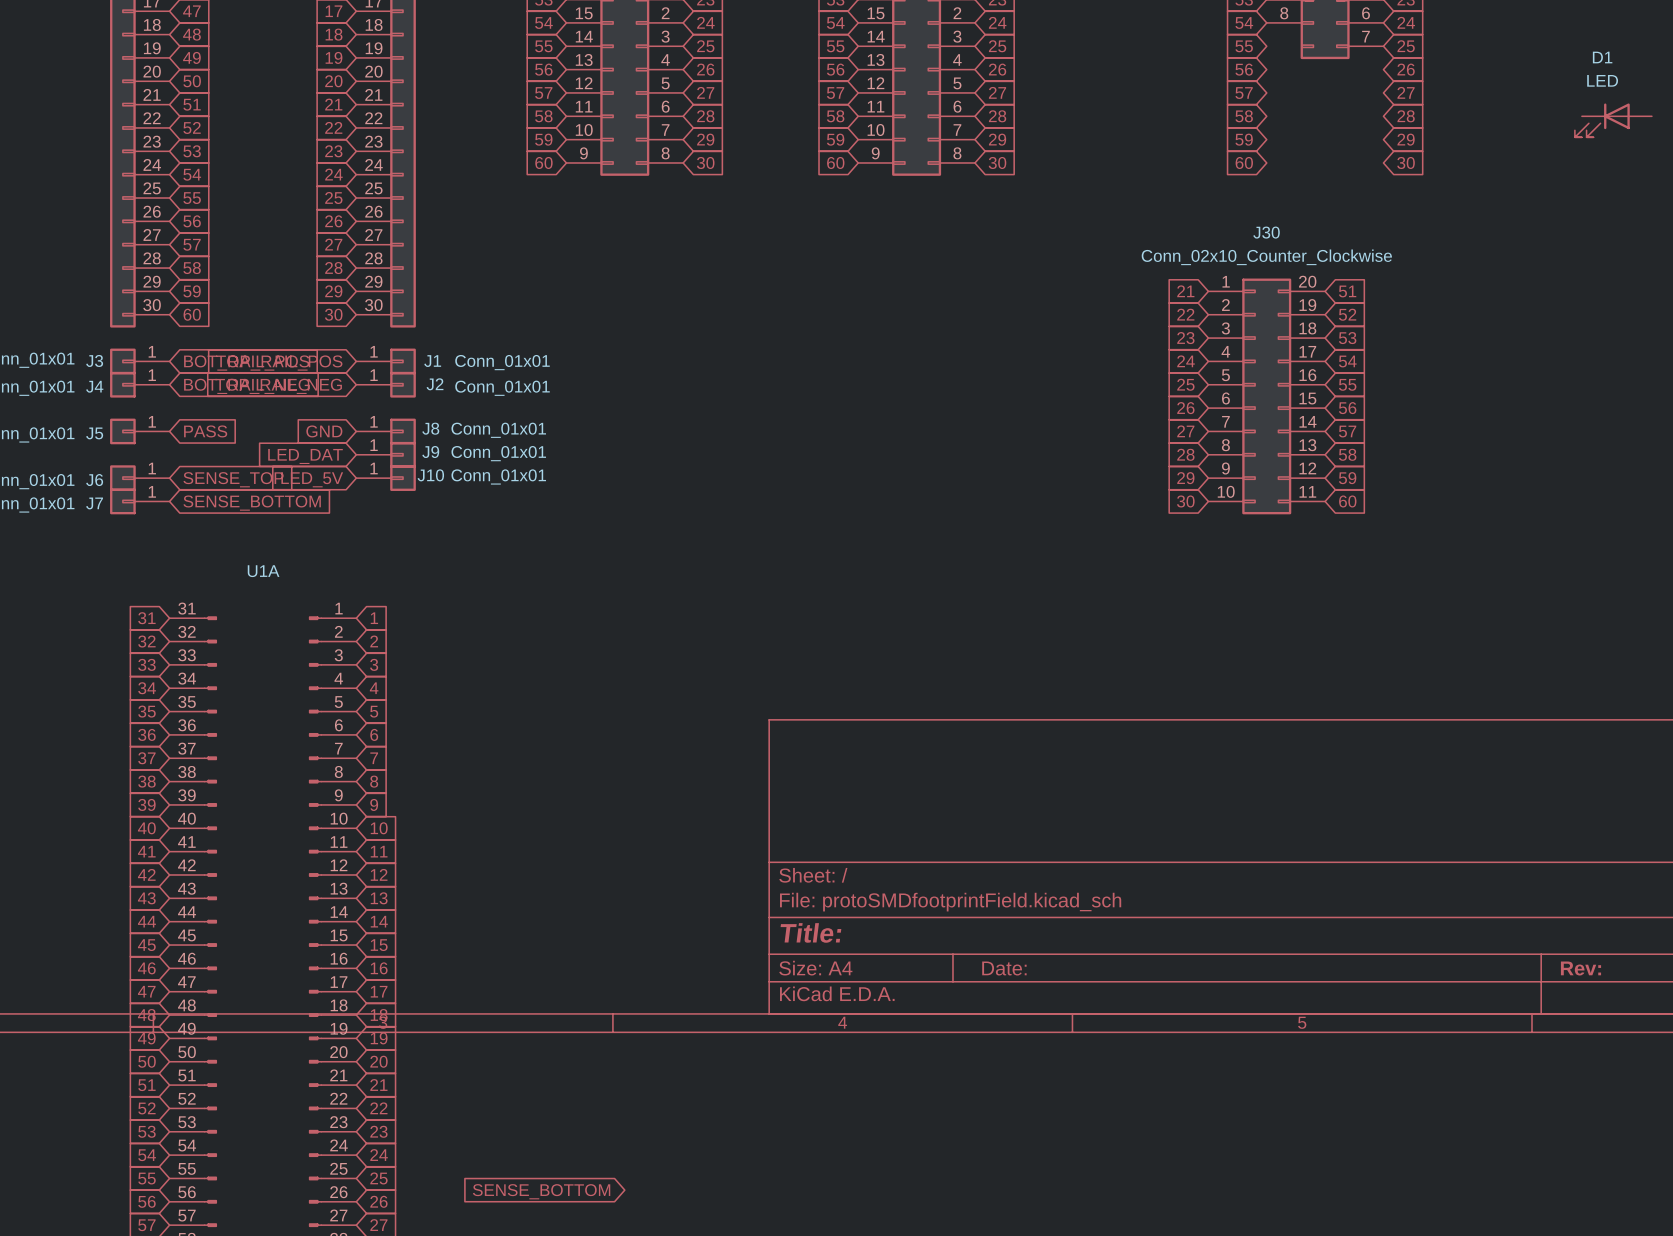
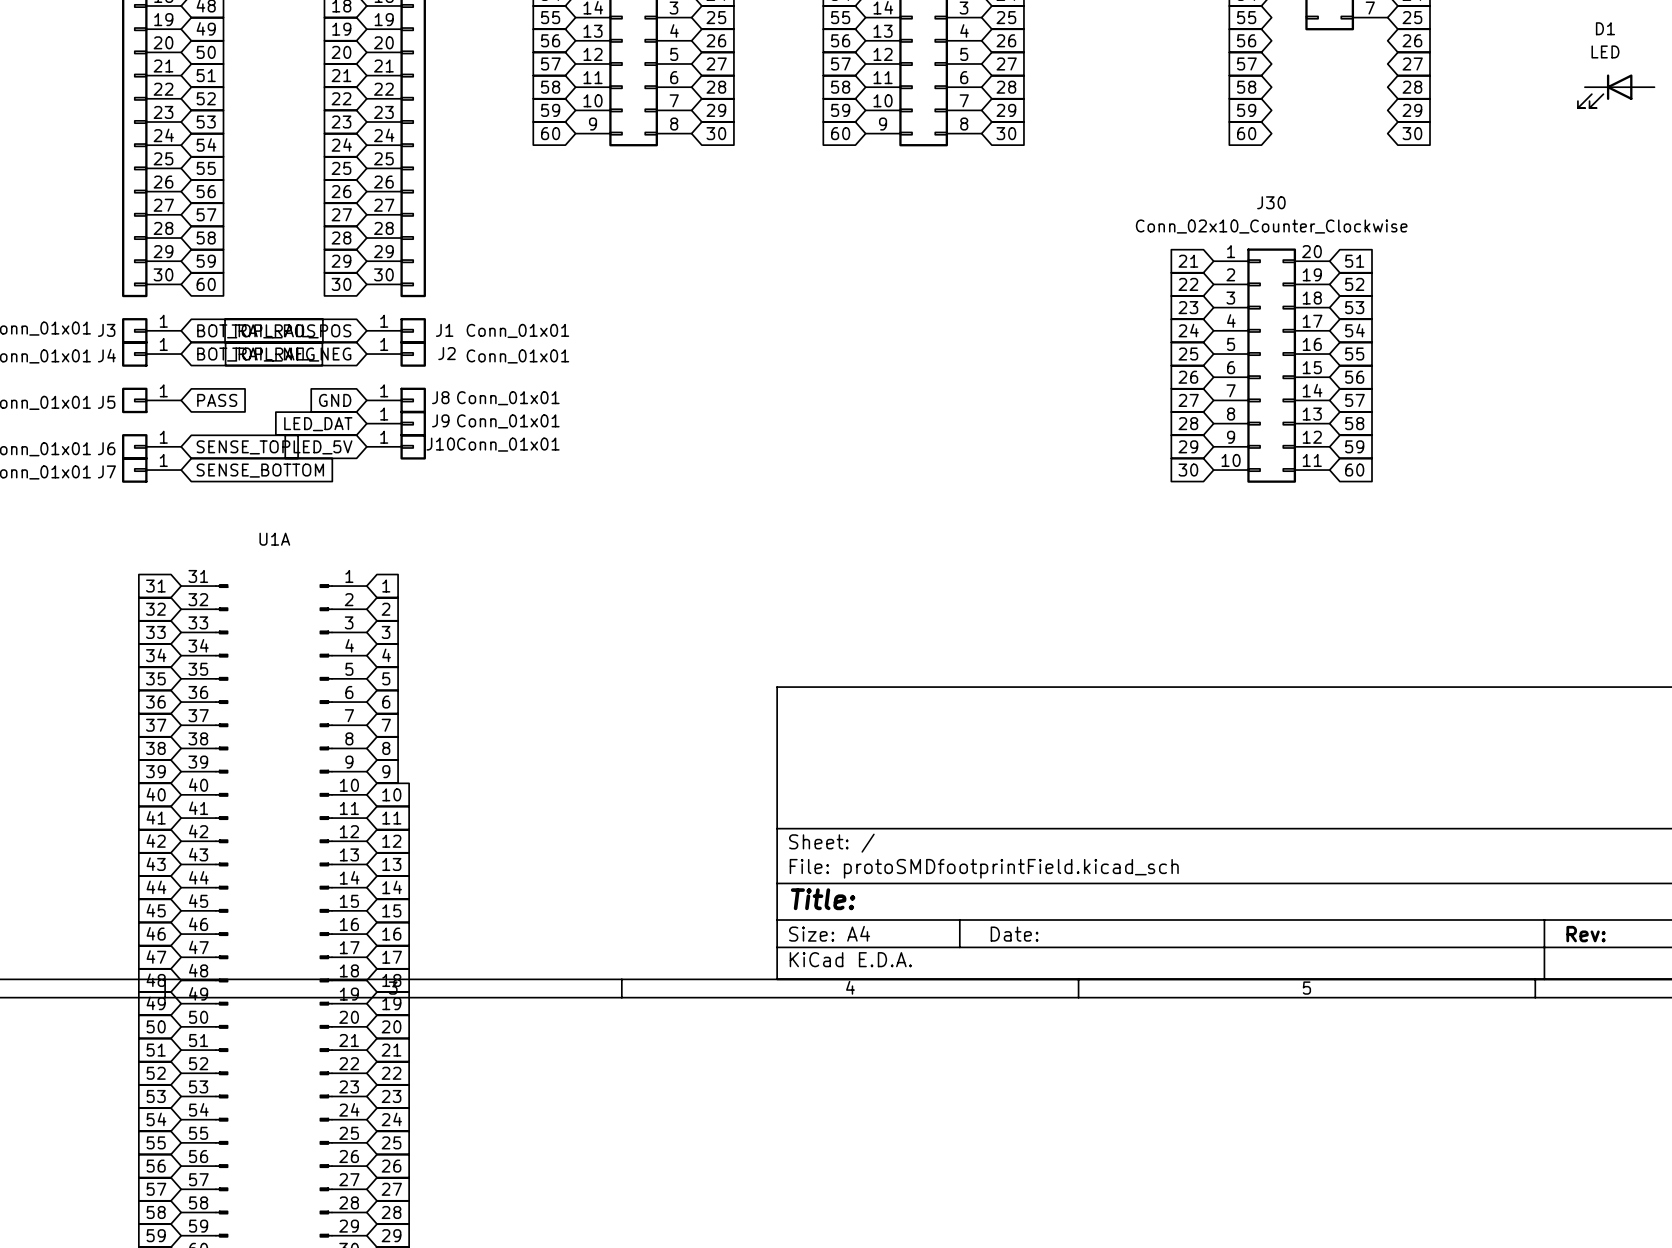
global label: SENSE_BOTTOM (541, 1191) -> none

